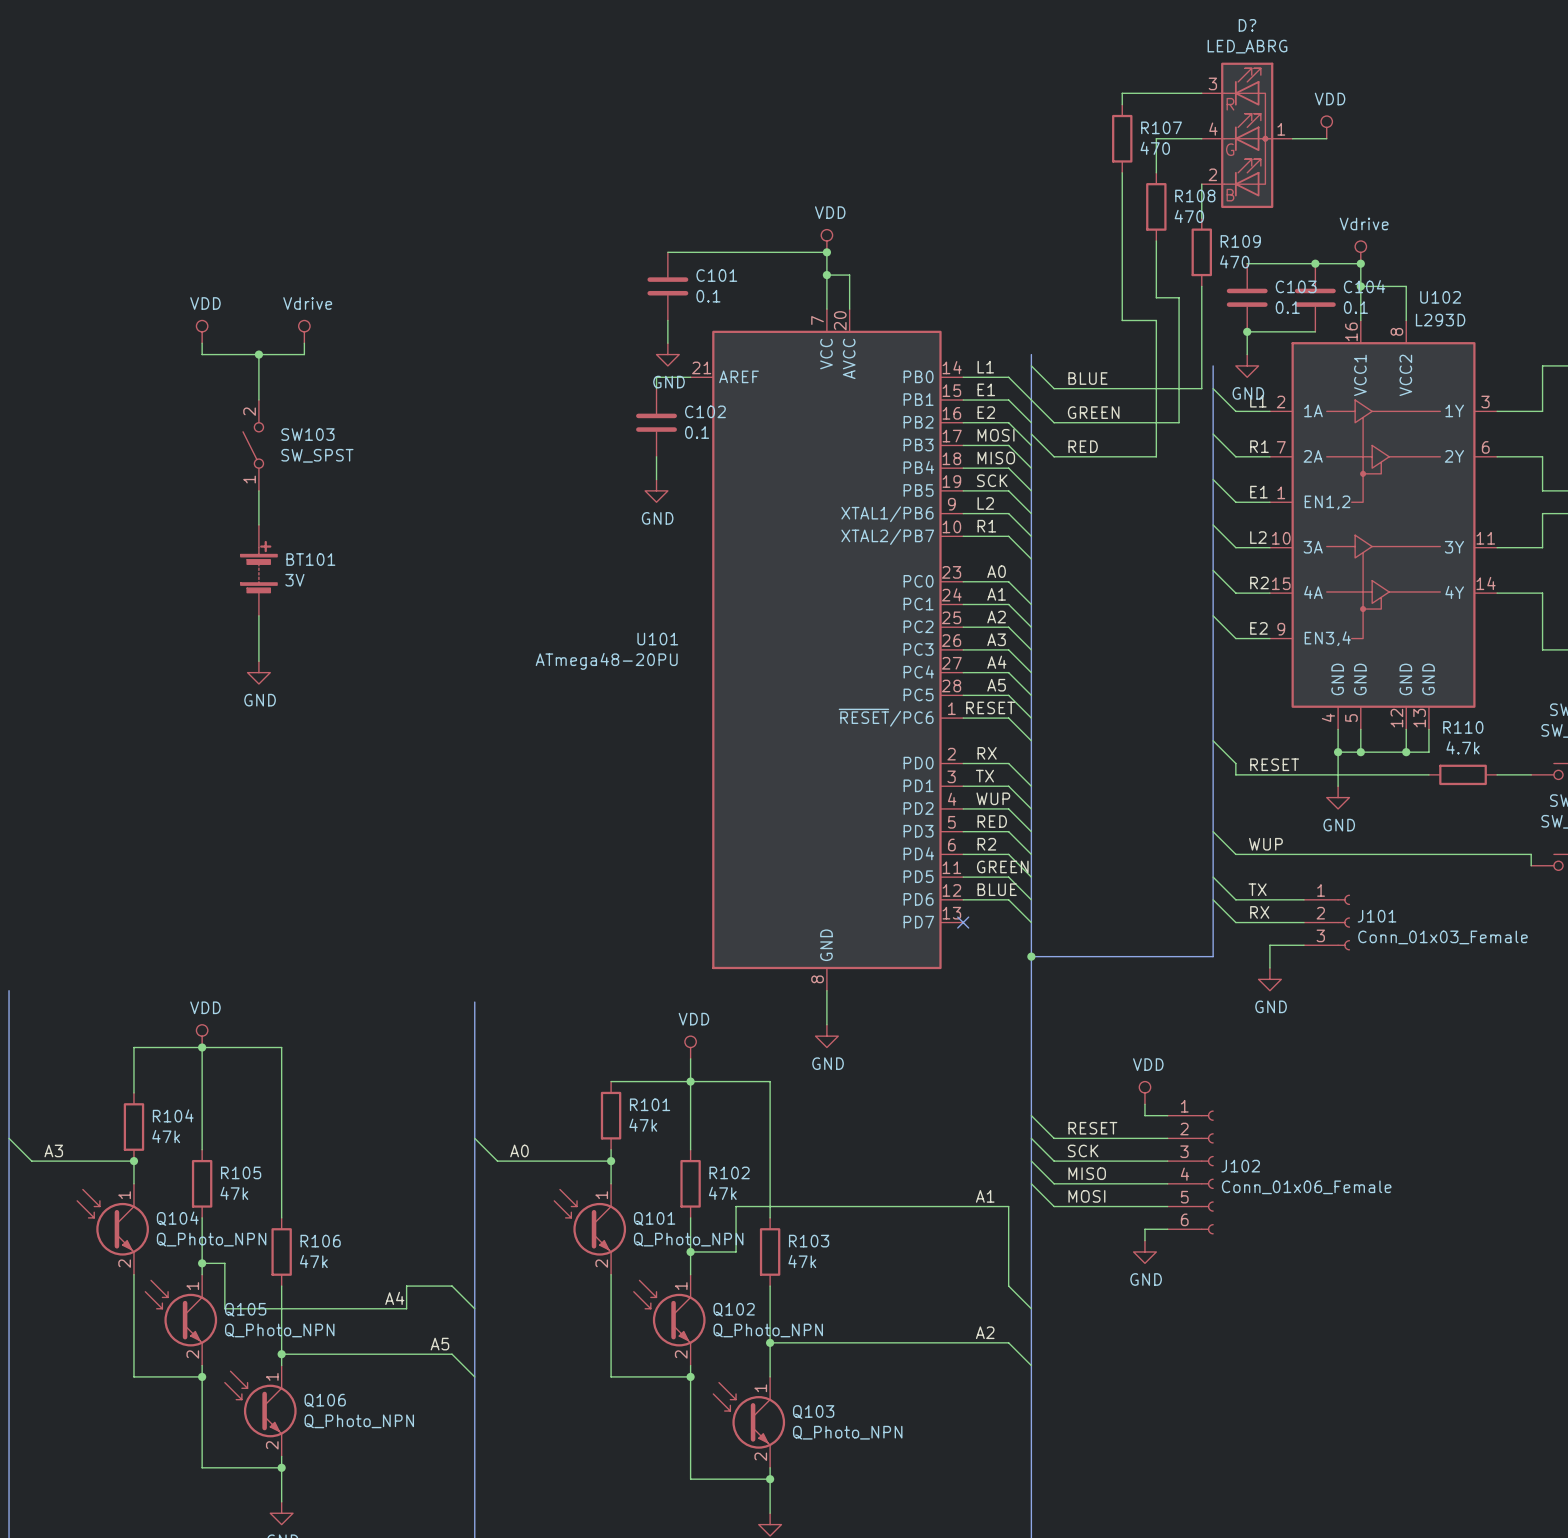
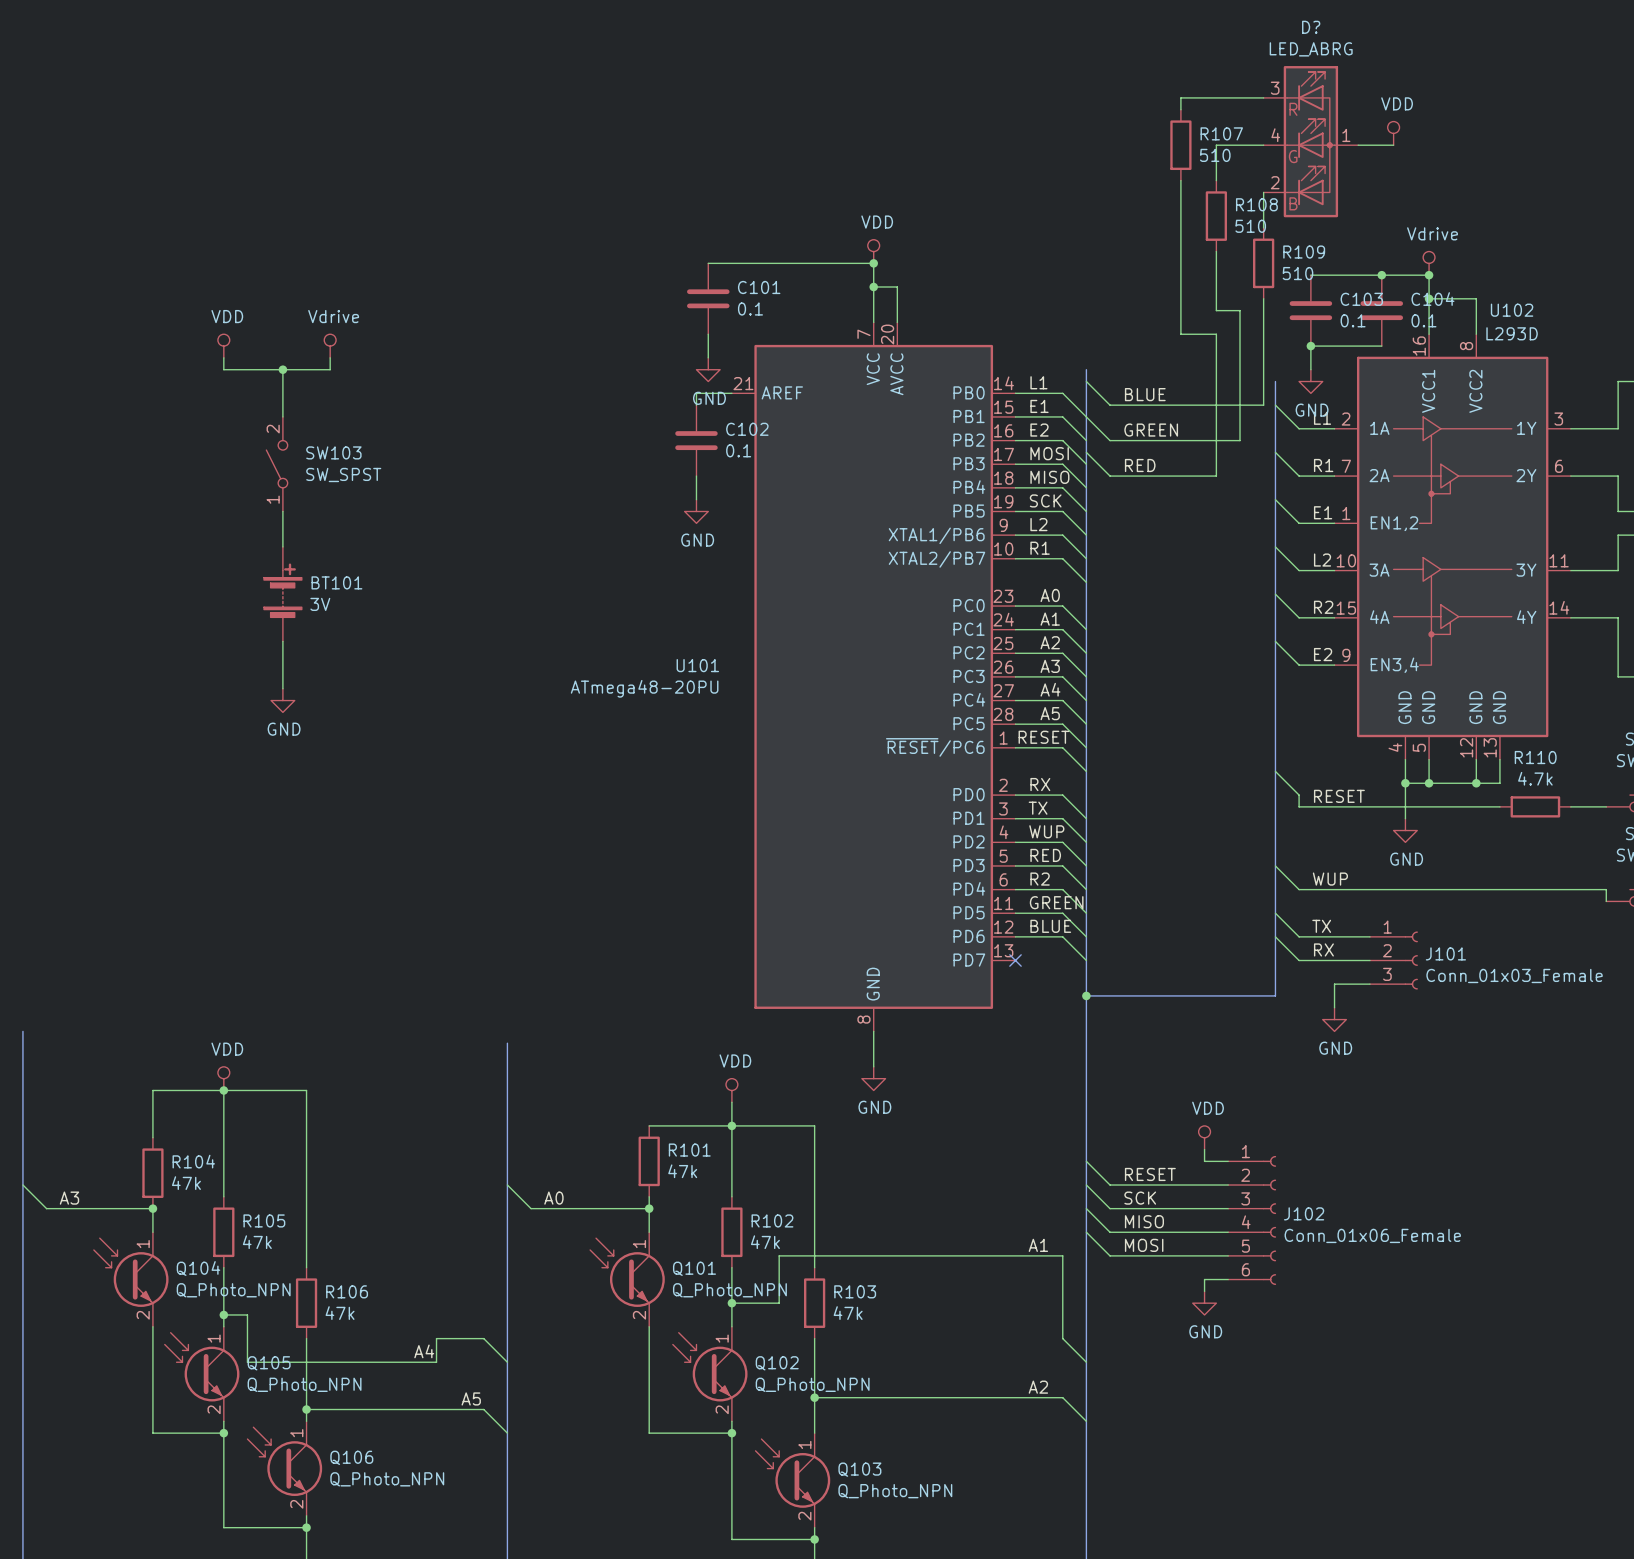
R107 value: 470 (1155, 148) -> 510 (1215, 155)
R108 value: 470 (1189, 216) -> 510 (1250, 226)
R109 value: 470 (1234, 261) -> 510 (1297, 273)

